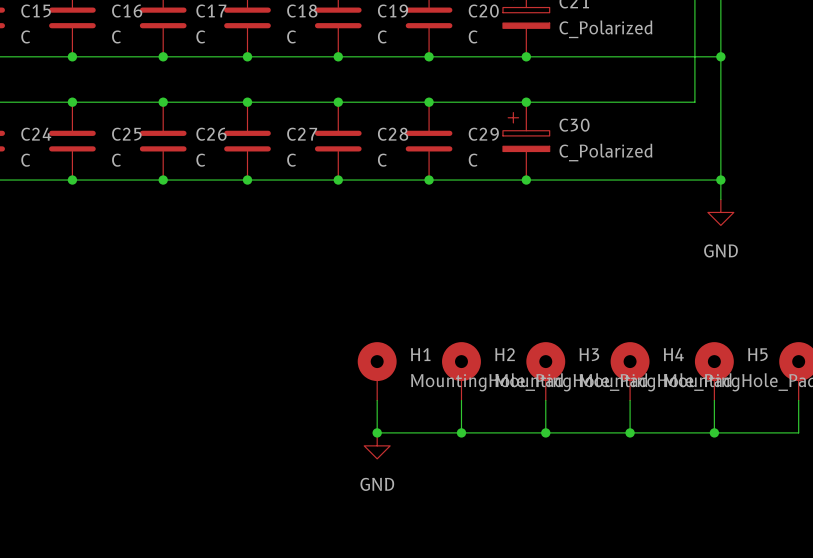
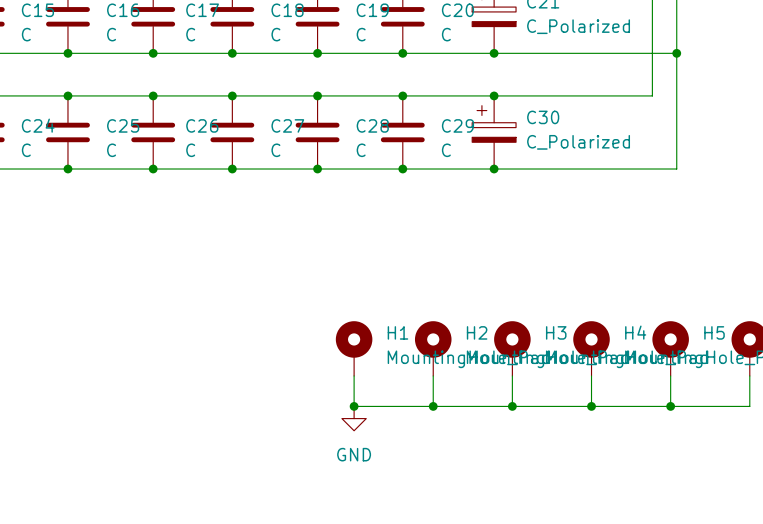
wire: (720, 180) (720, 199) -> none
junction: (720, 180) -> none
power symbol: GND (720, 212) -> none

